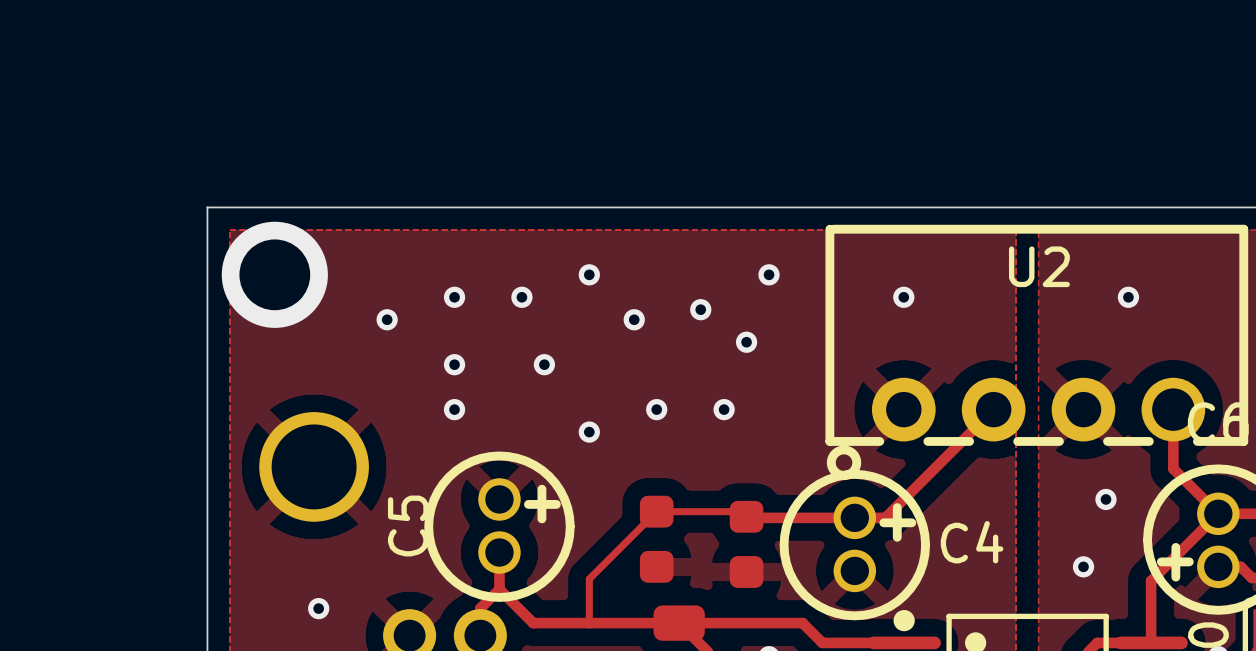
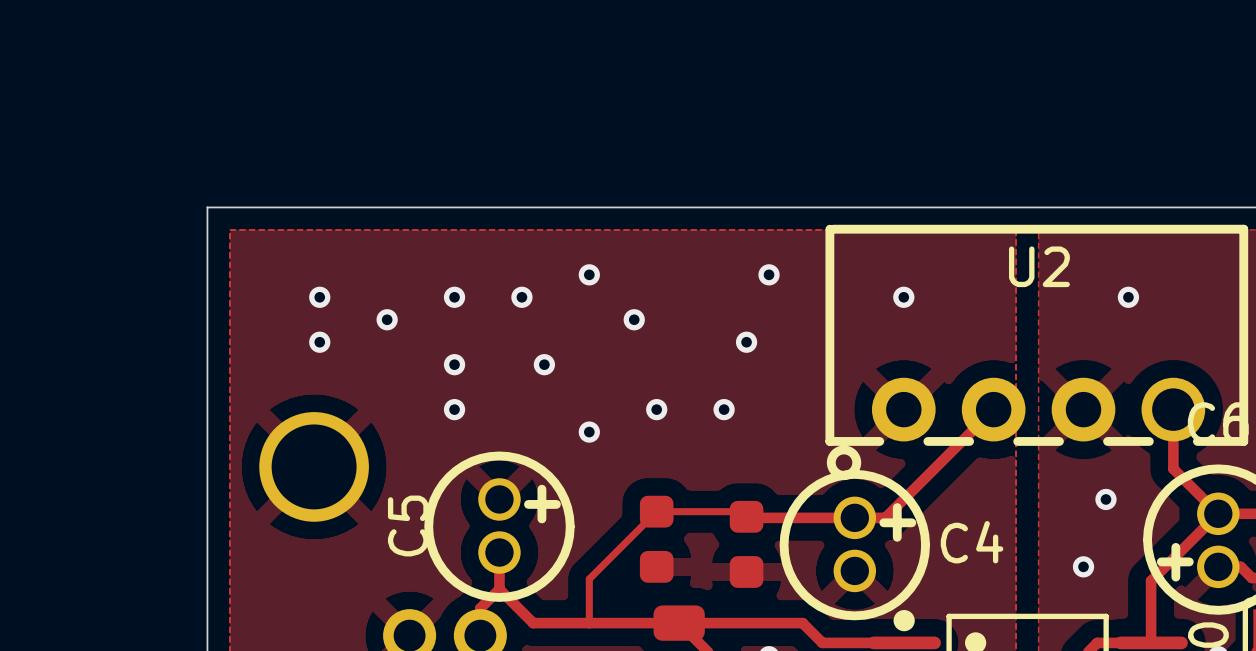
via: (274, 274) -> none
via: none -> (319, 297)
via: (700, 309) -> none
via: none -> (319, 342)
via: (318, 608) -> none

